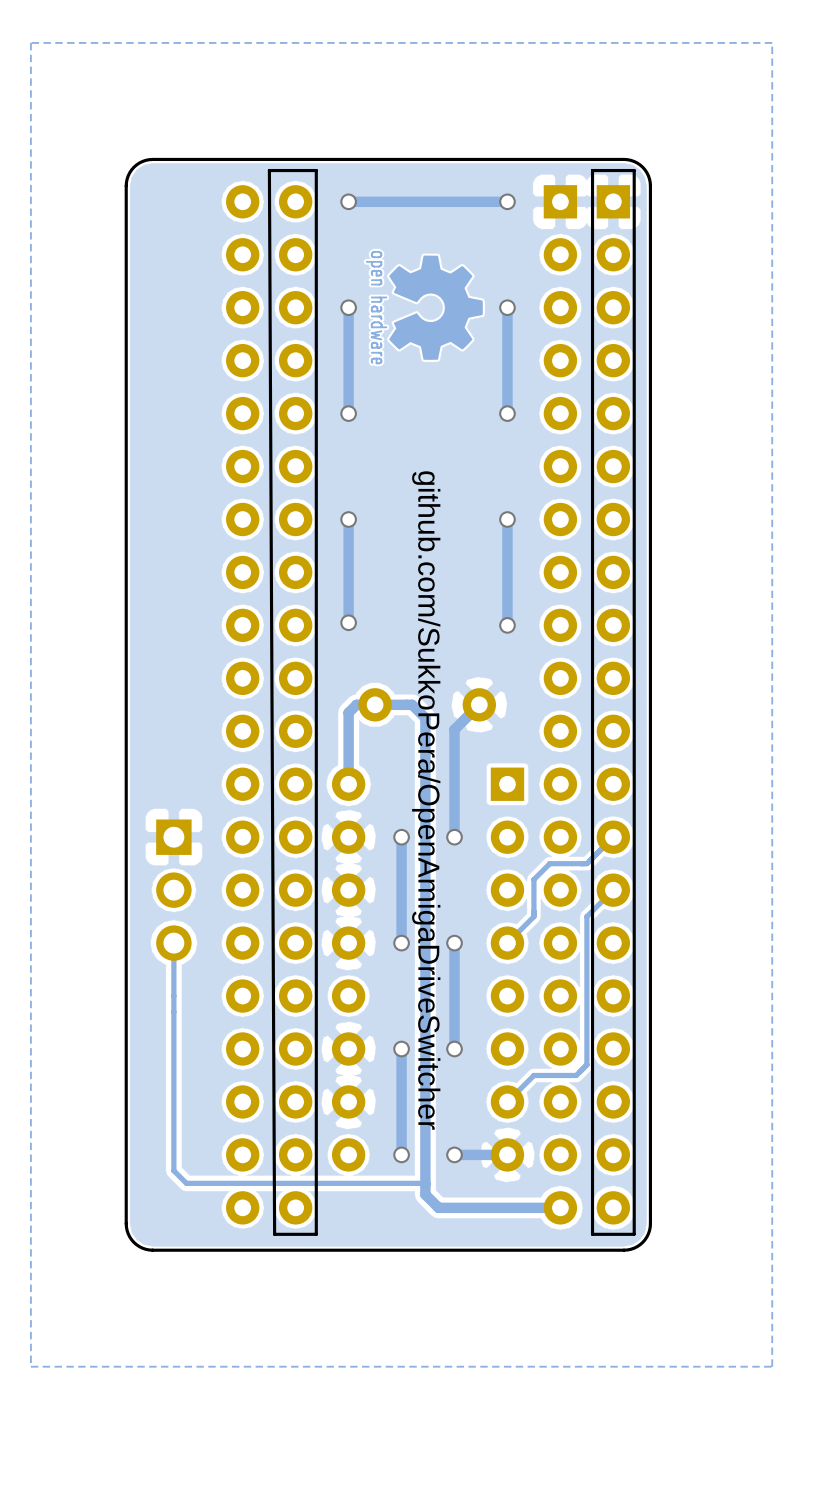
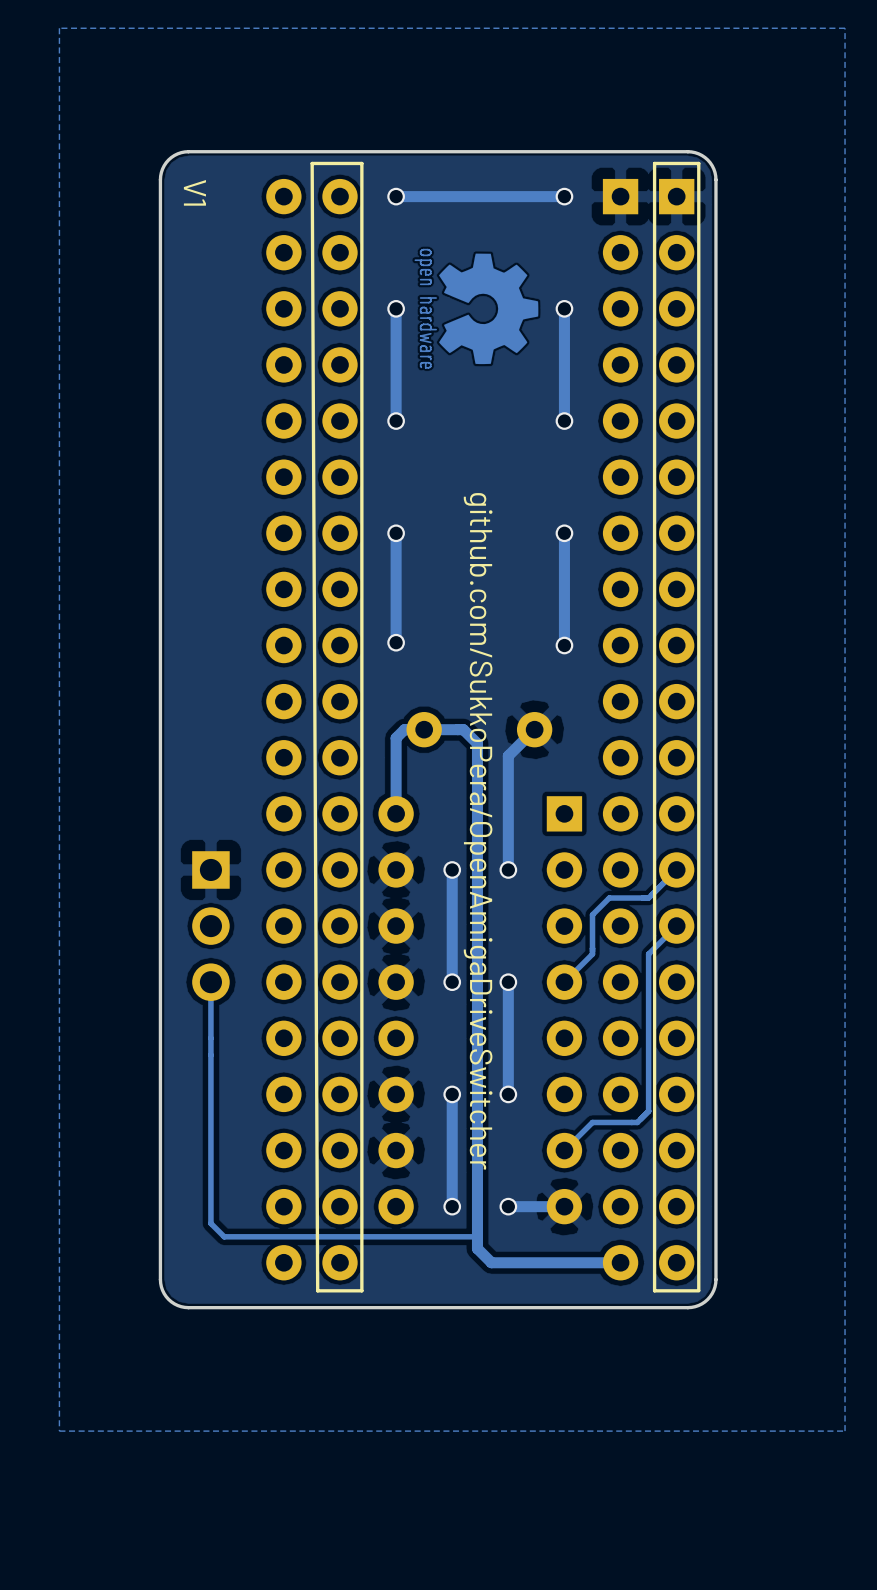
text: none -> V1 (194, 192)

